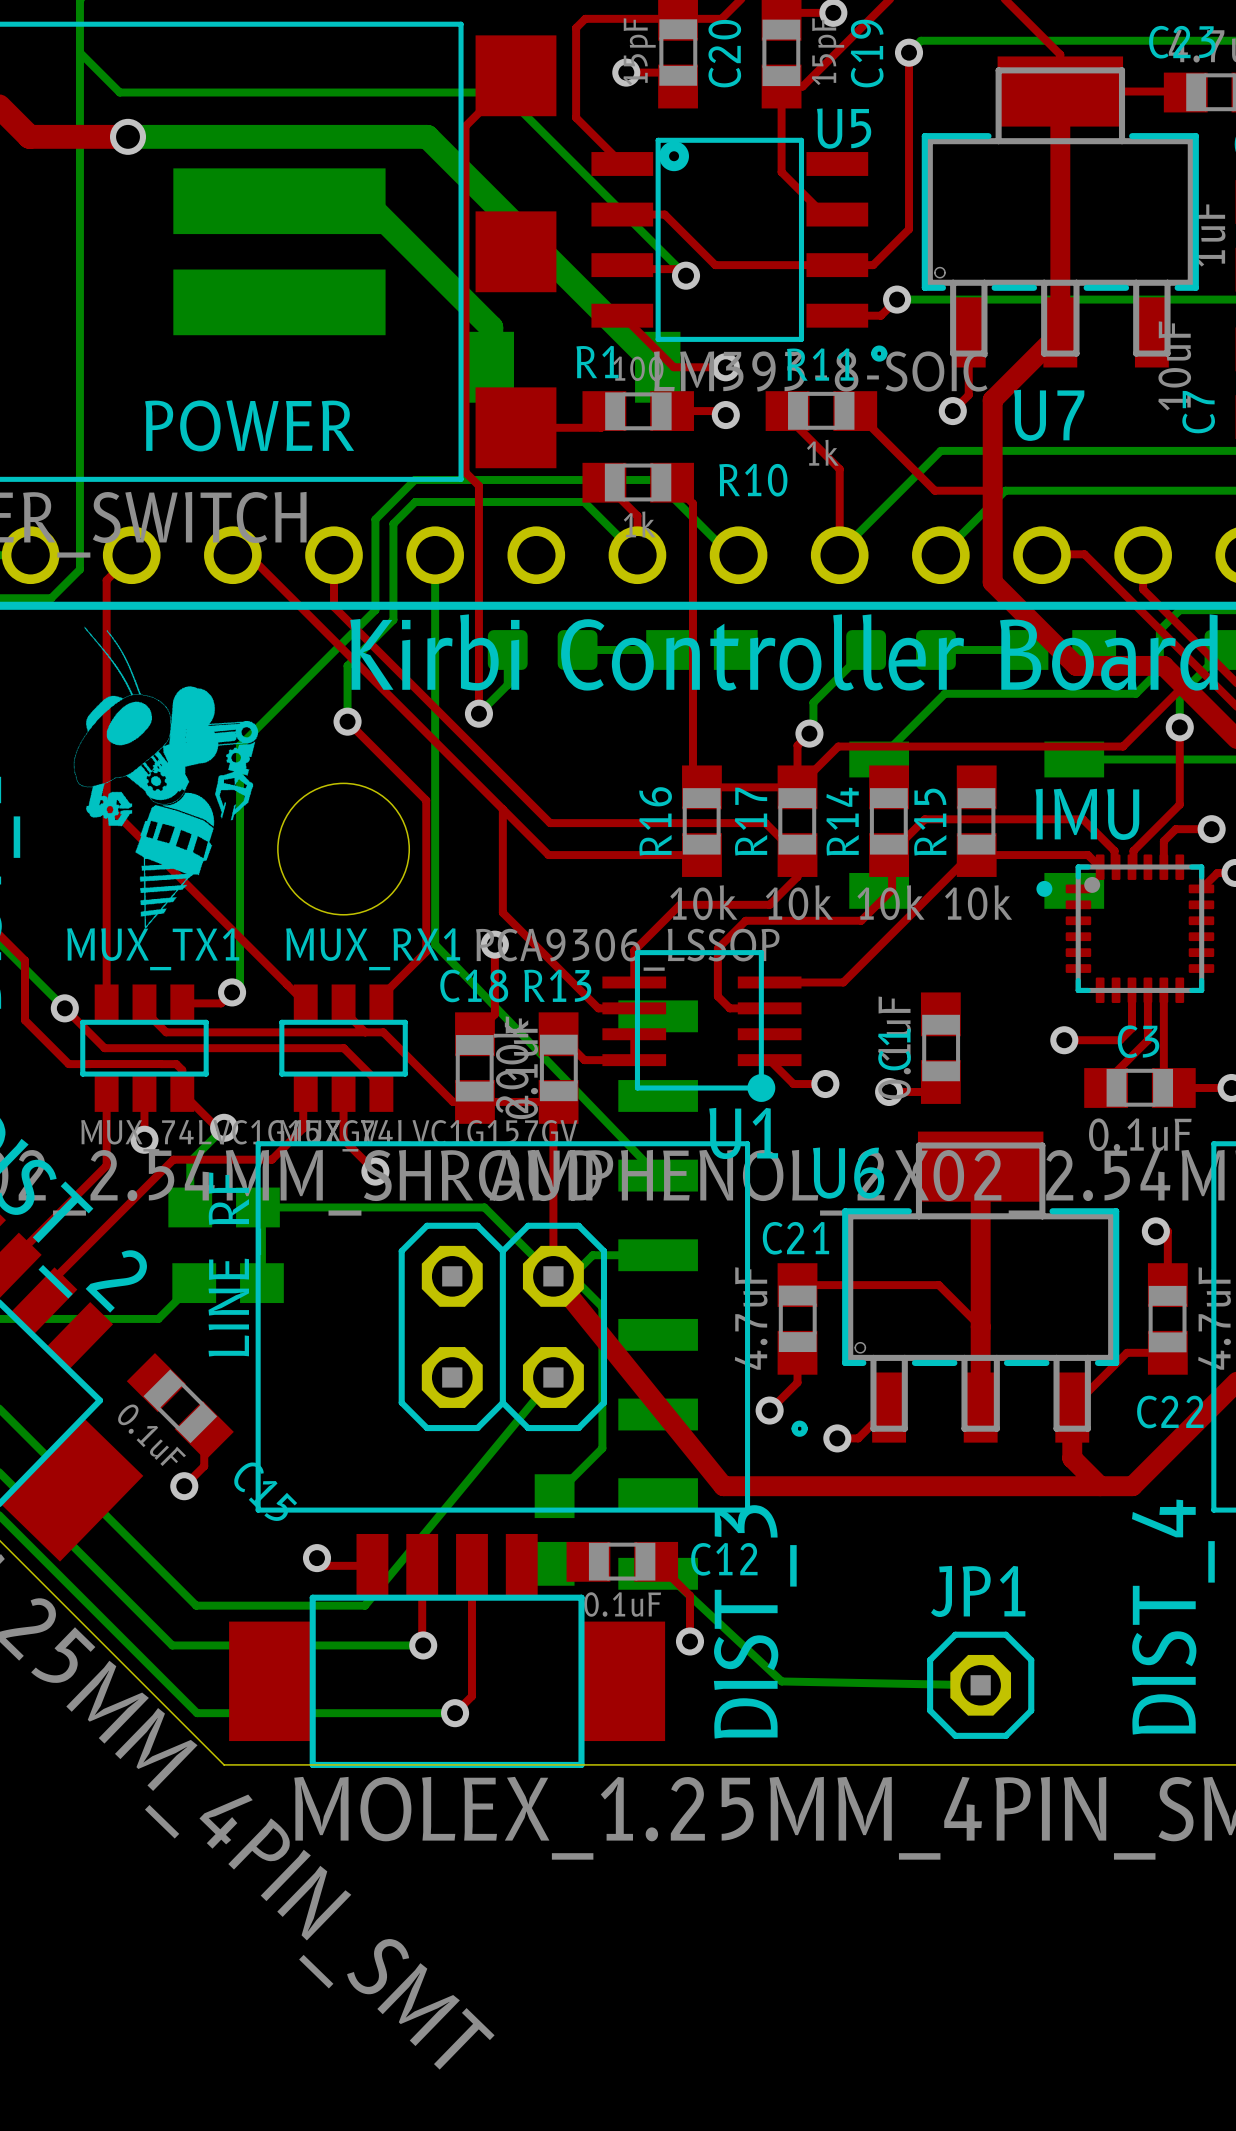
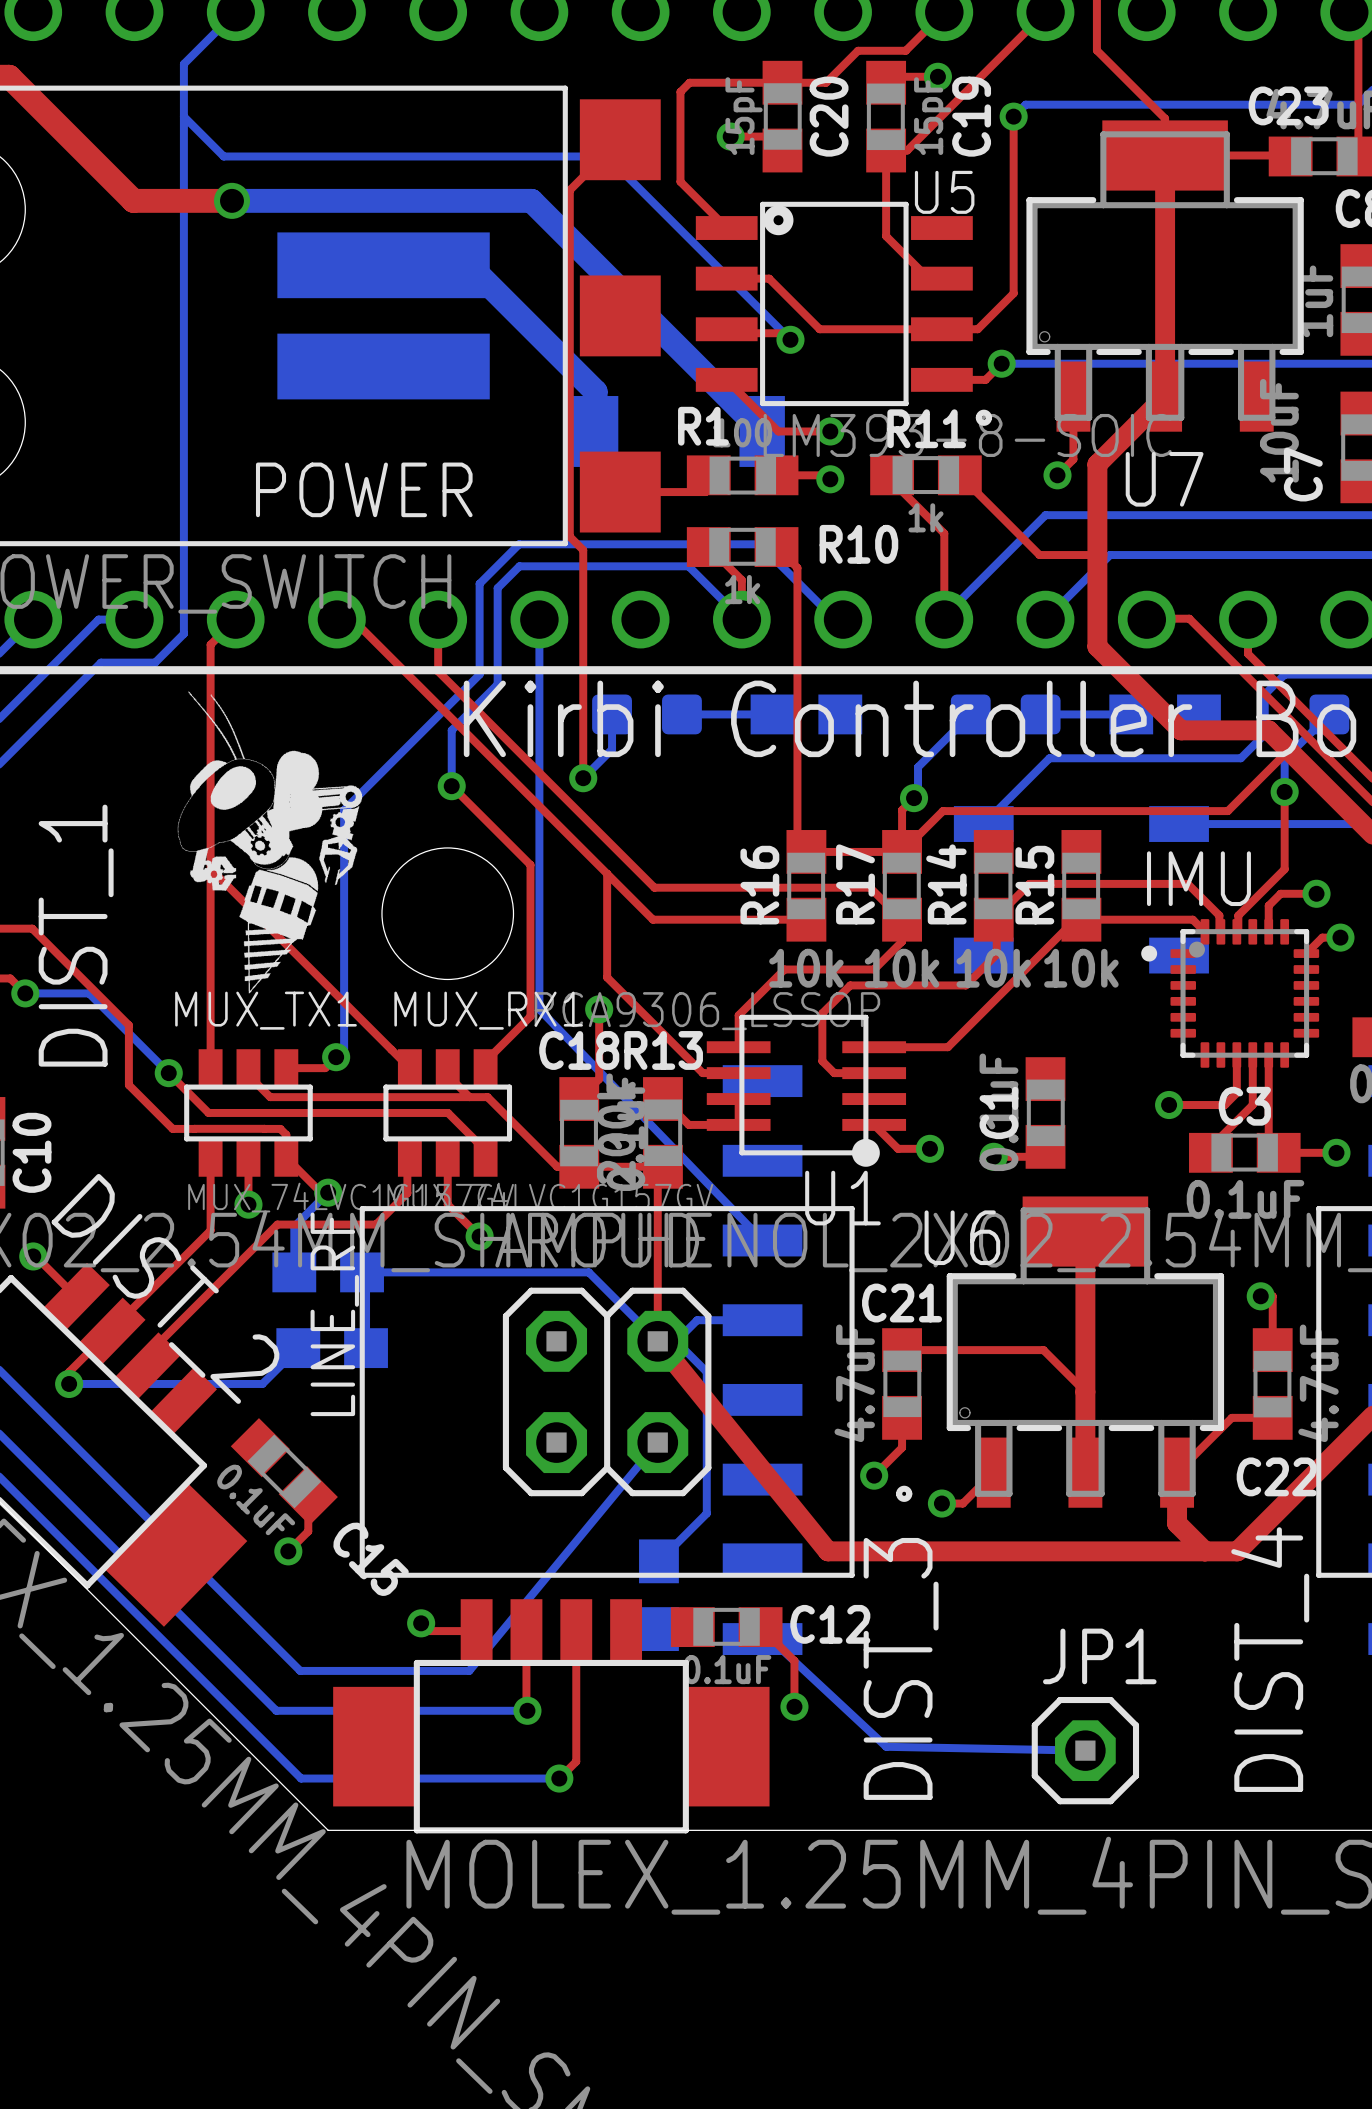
DIST_3 name position: DIST_3 (755, 1621) -> DIST_3 (901, 1668)

